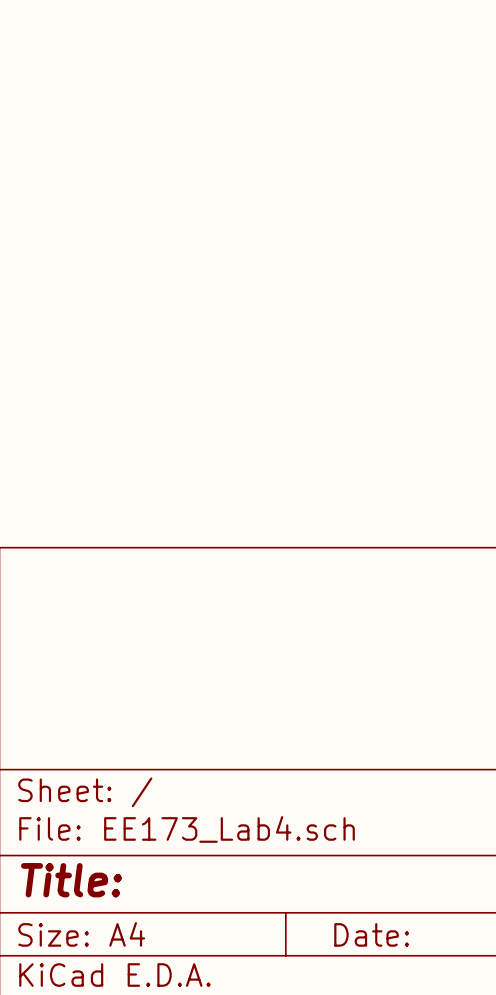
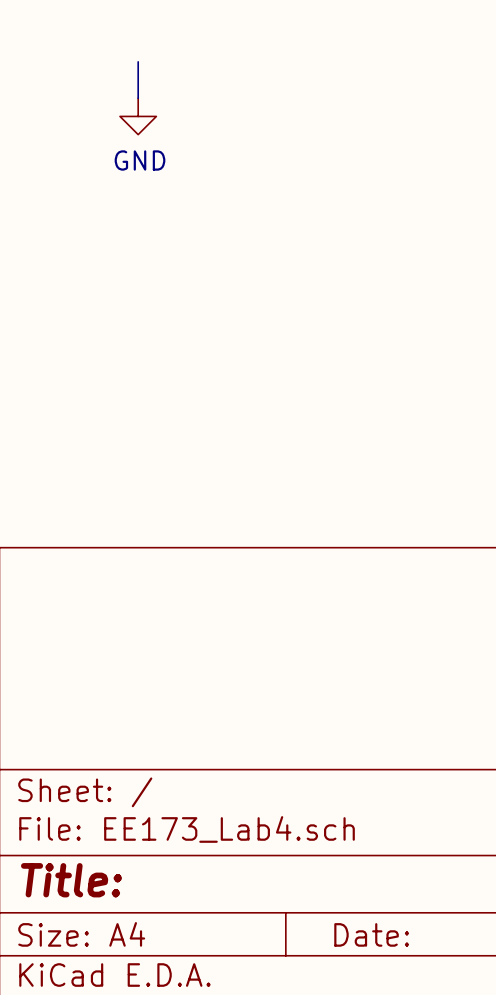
wire: none -> (138, 61) (138, 98)
power symbol: none -> GND (138, 116)

